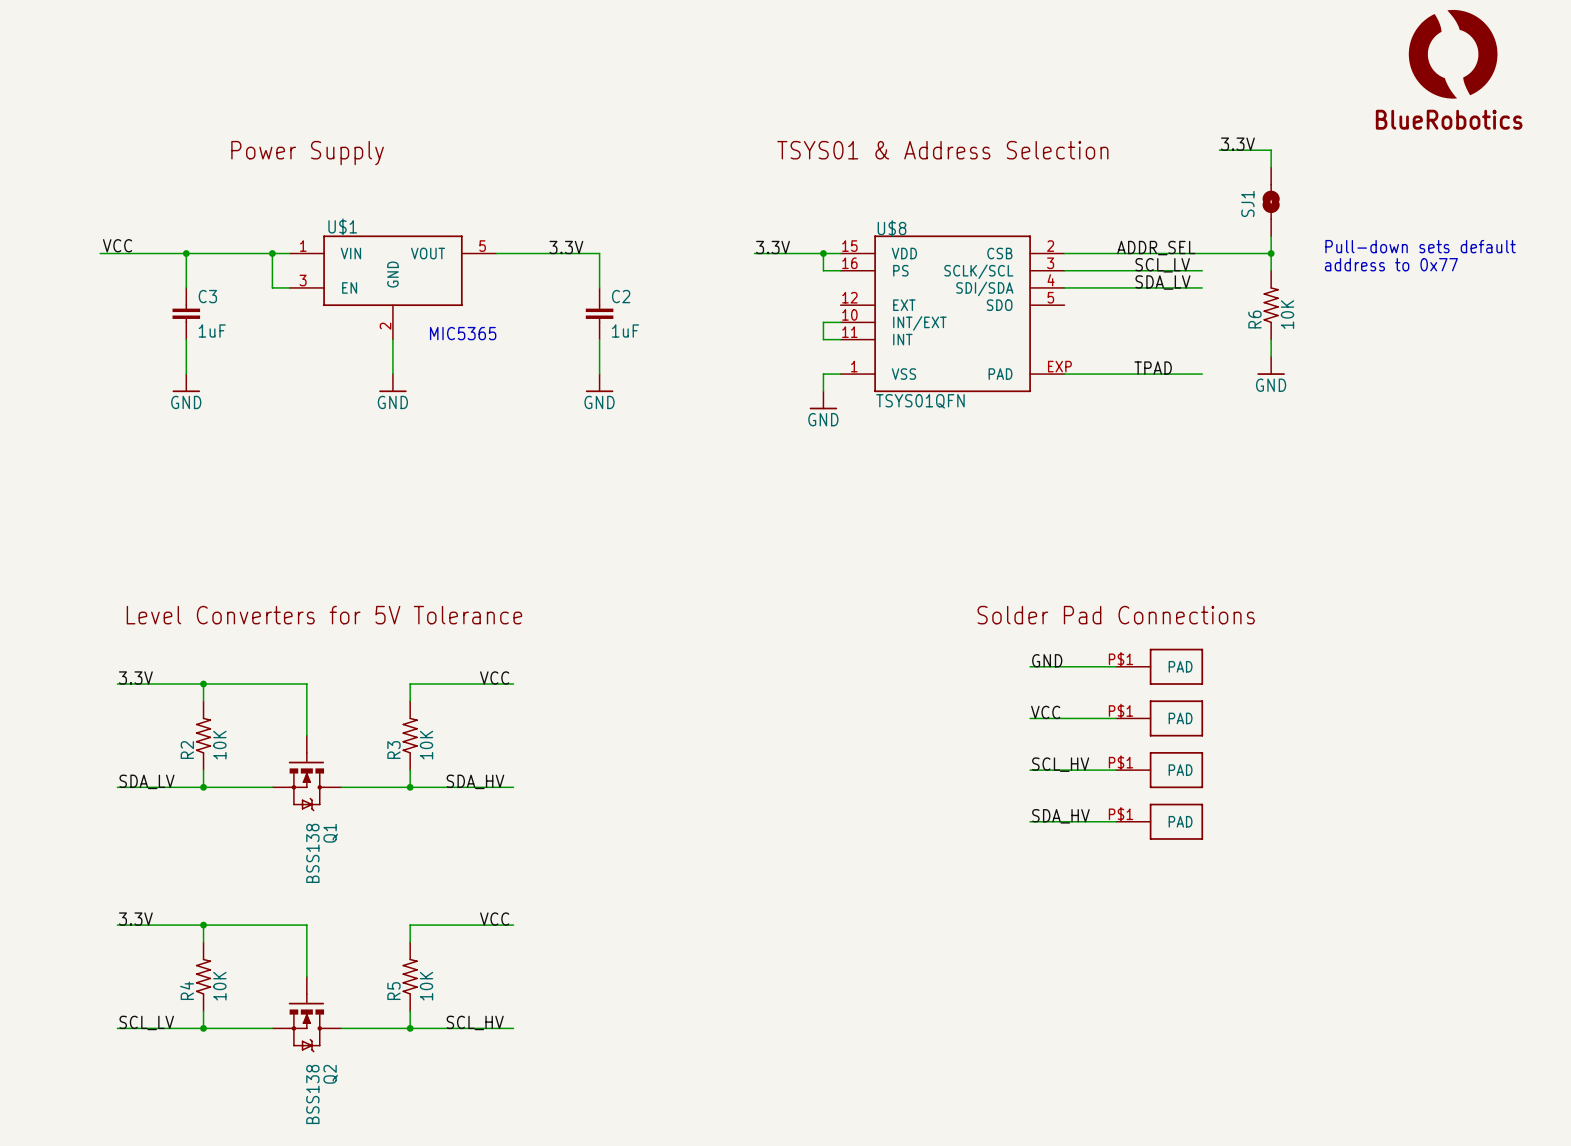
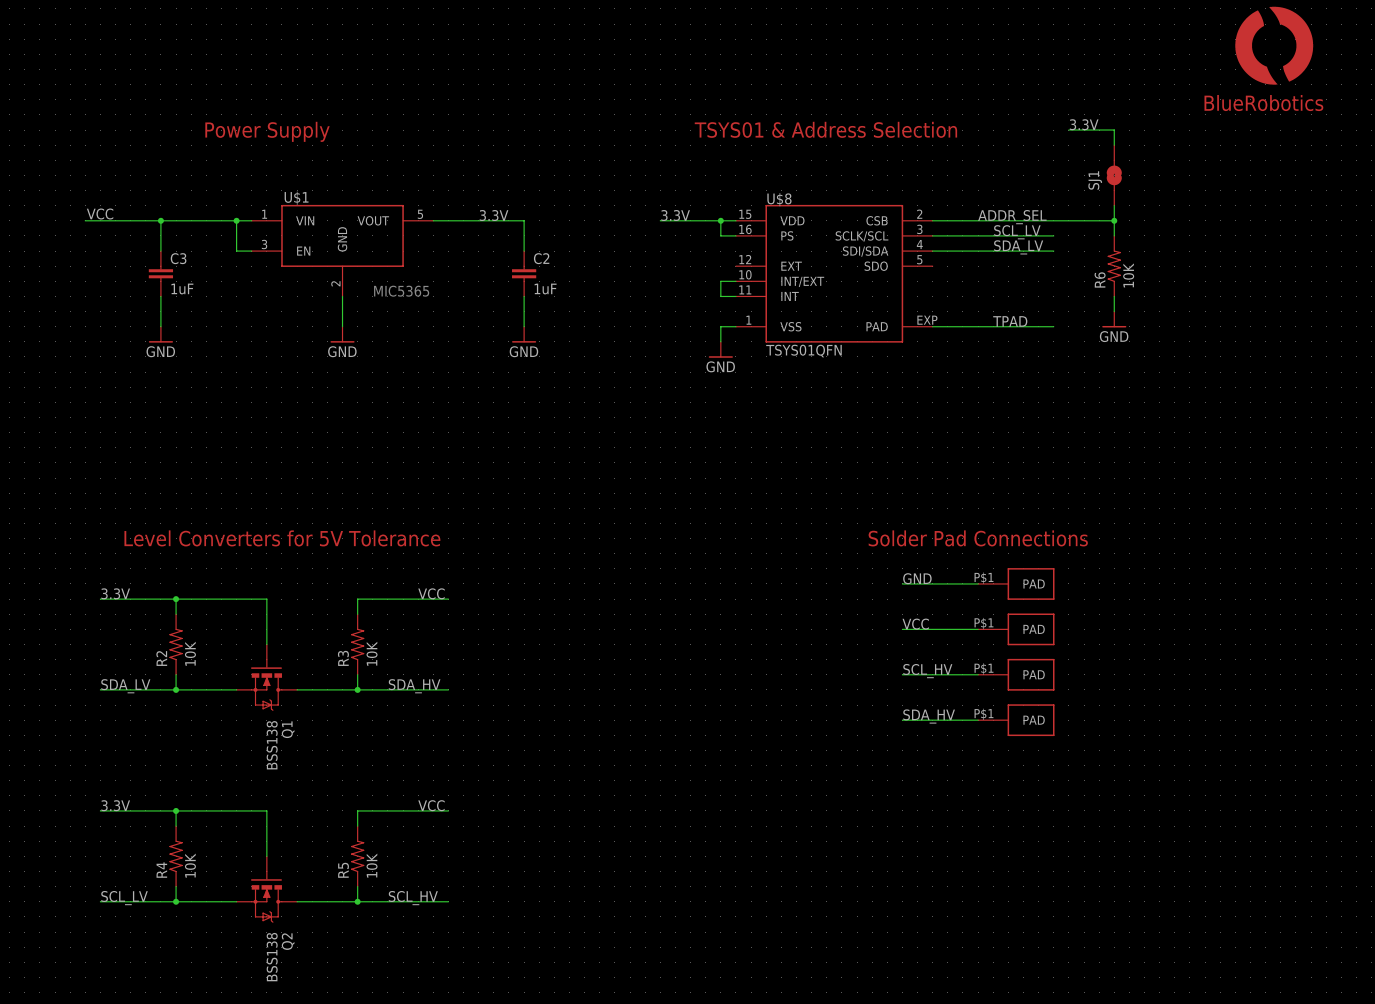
text: Pull-down sets default (1420, 246) -> none
text: address to 0x77 (1391, 264) -> none

